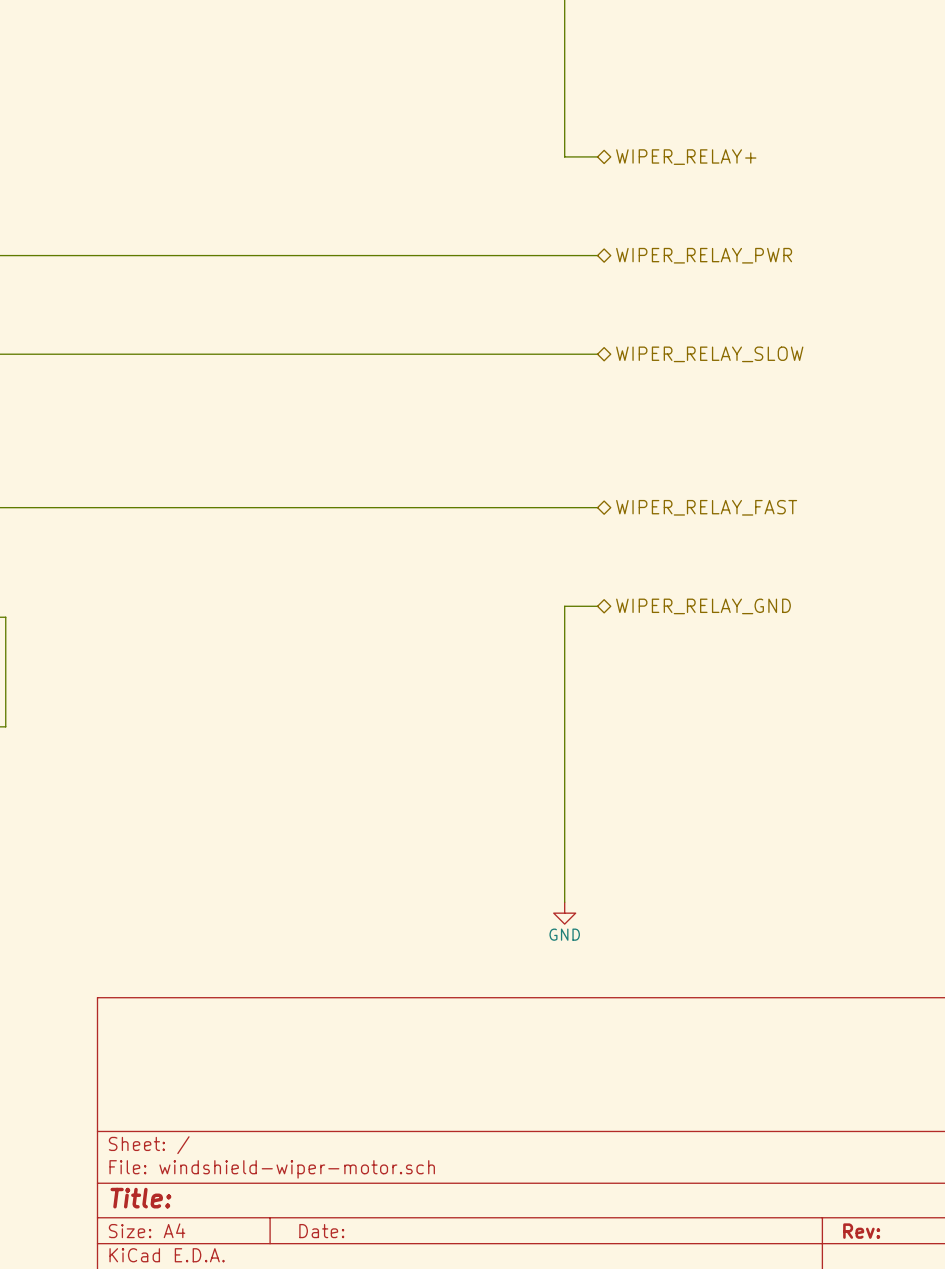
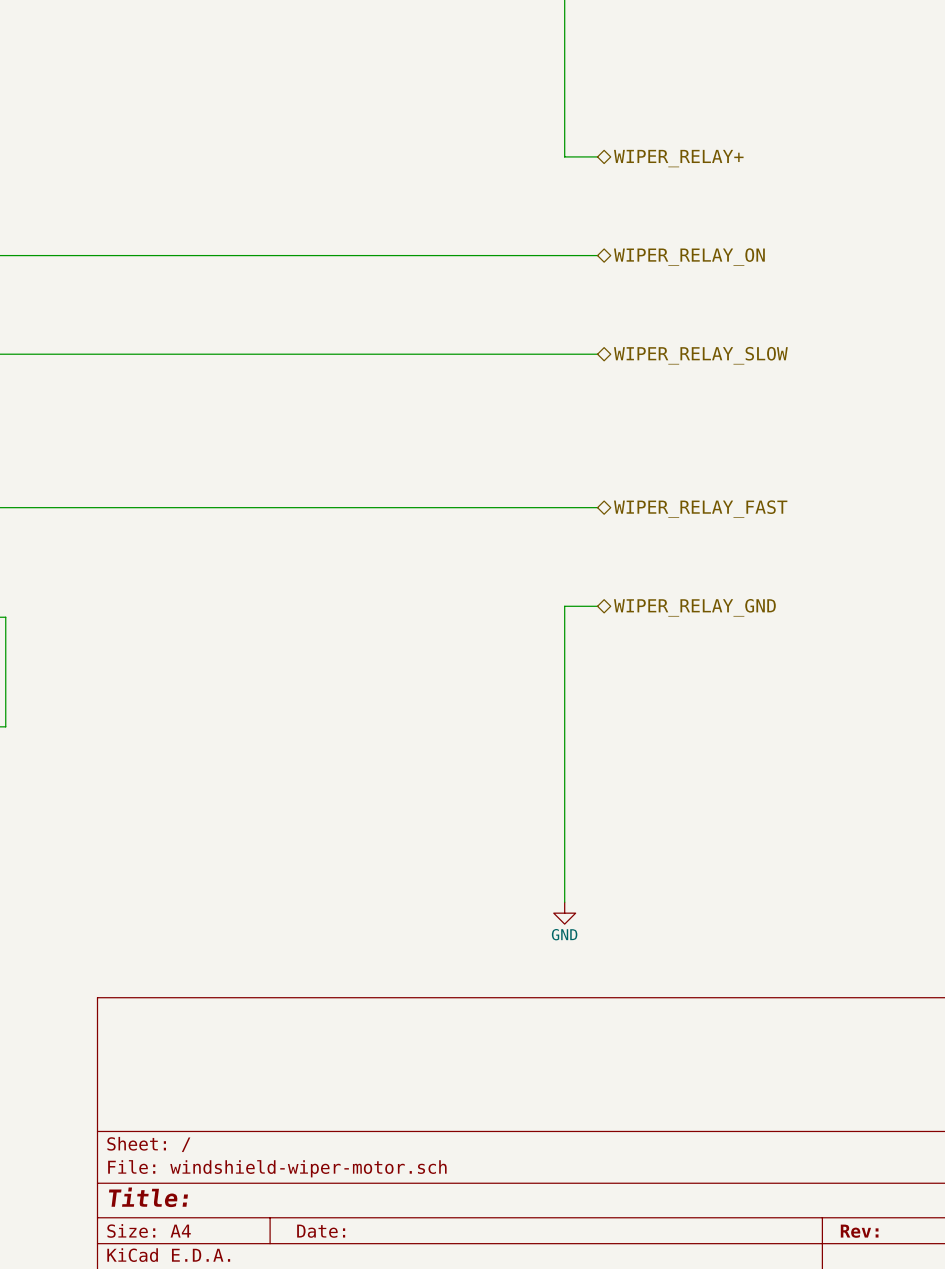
hierarchical label: WIPER_RELAY_PWR (704, 255) -> WIPER_RELAY_ON (689, 257)

